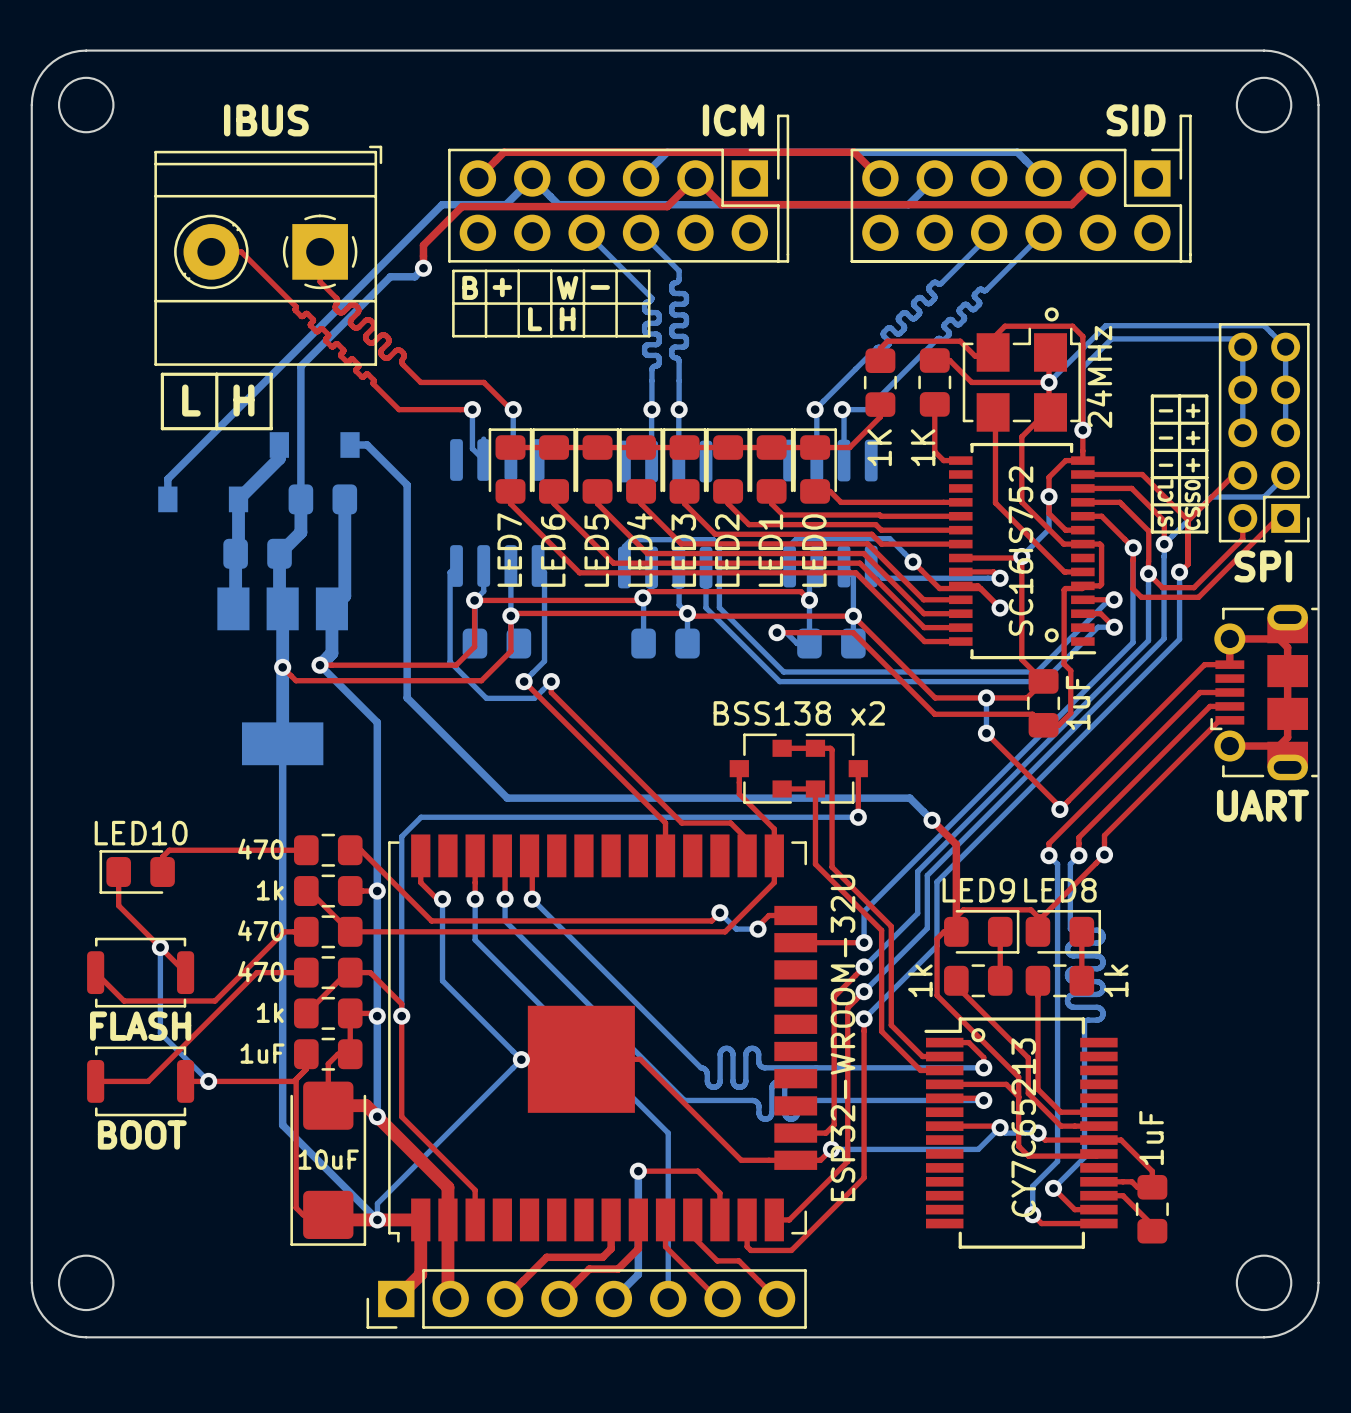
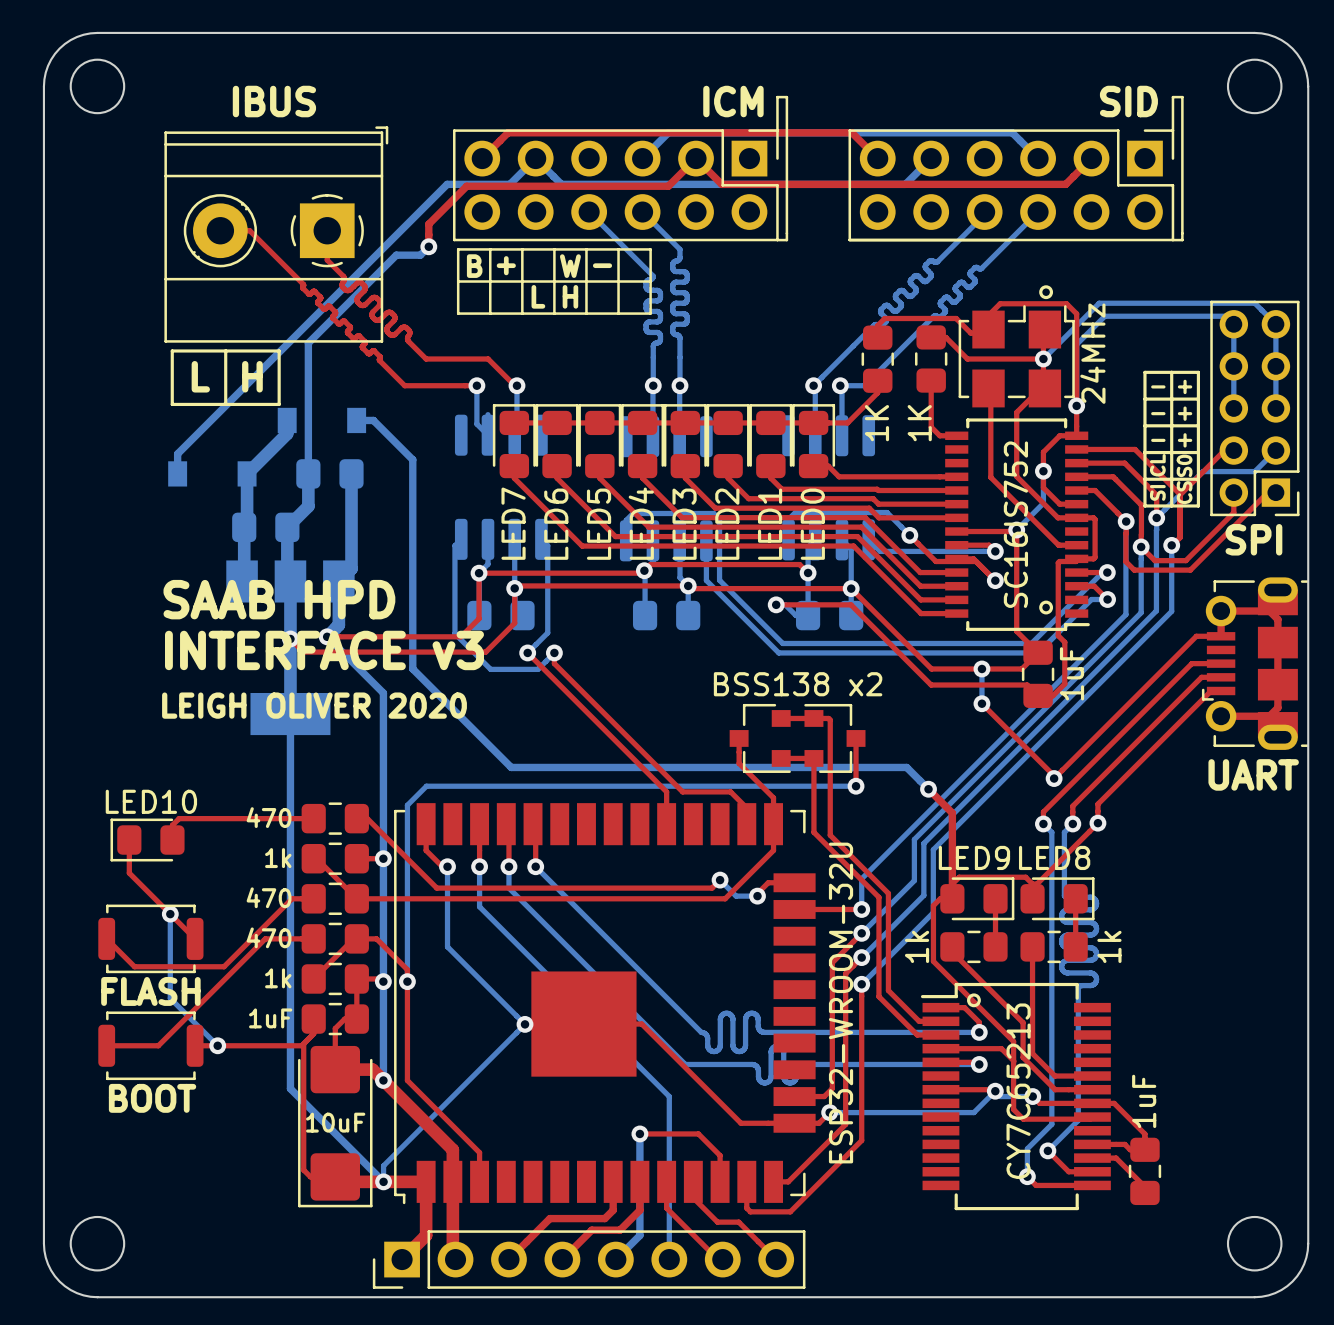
text: none -> SAAB HPD (279, 599)
text: none -> INTERFACE v3 (324, 650)
text: none -> LEIGH OLIVER 2020 (314, 705)

